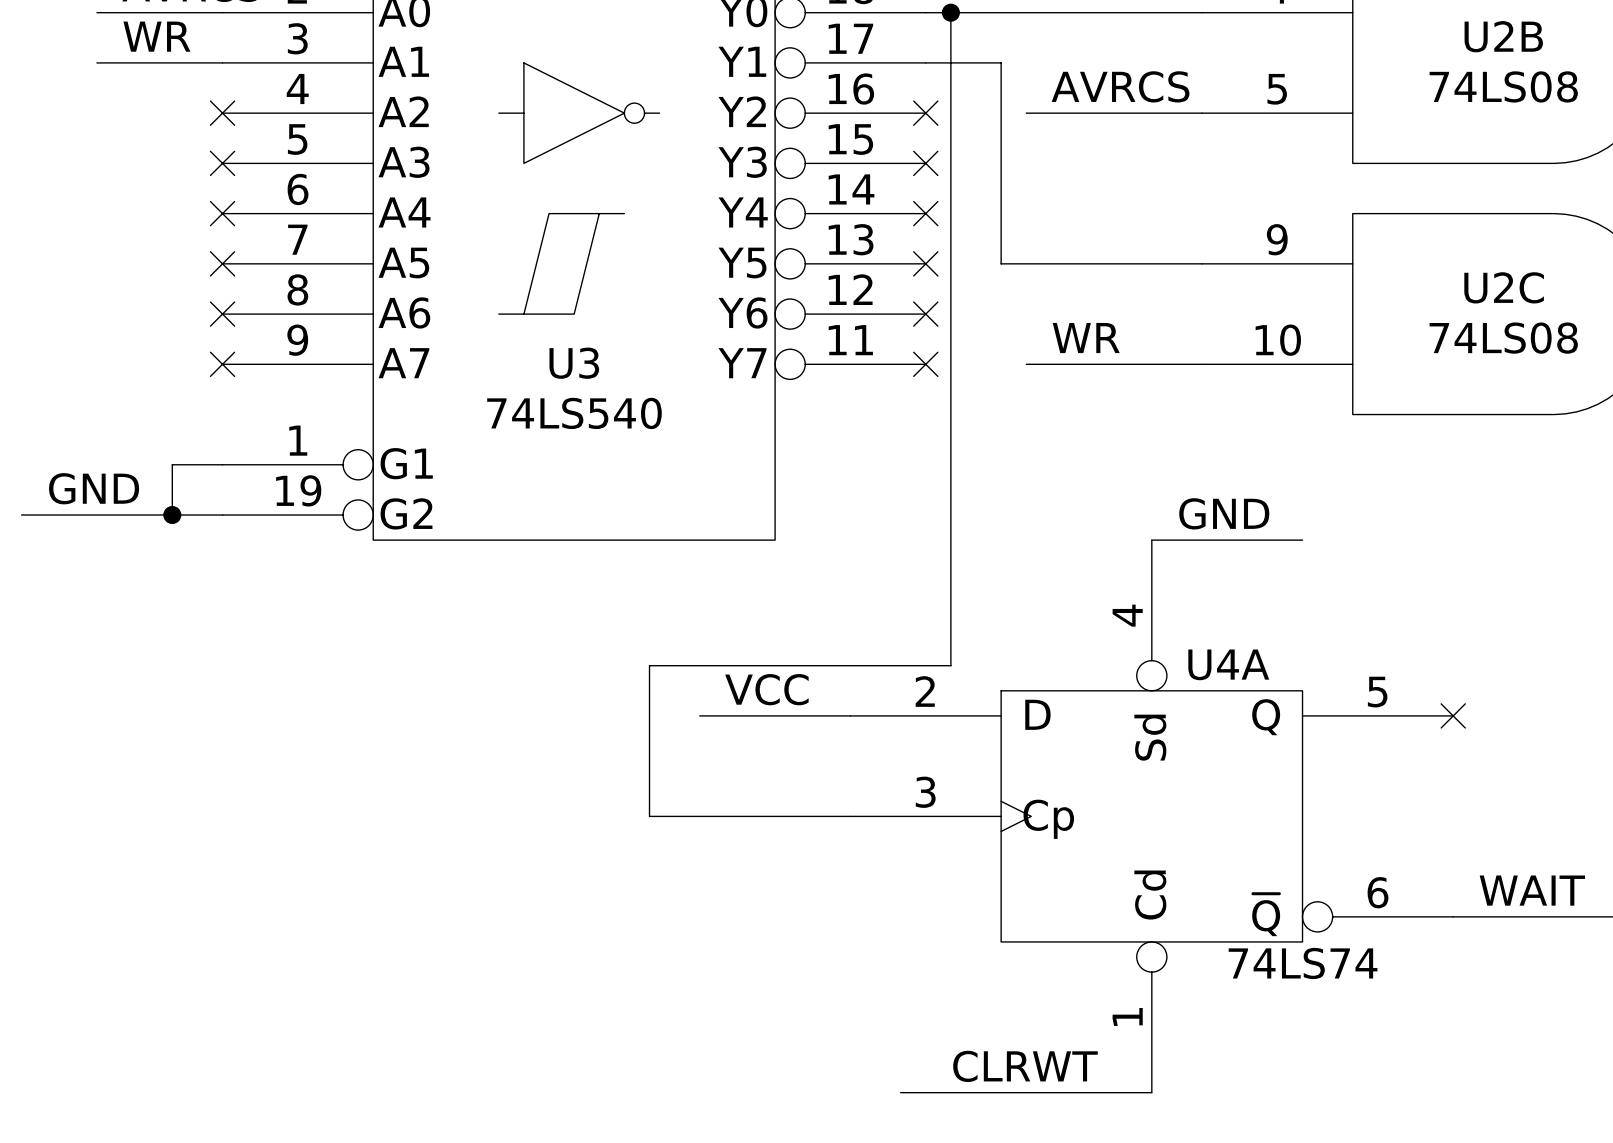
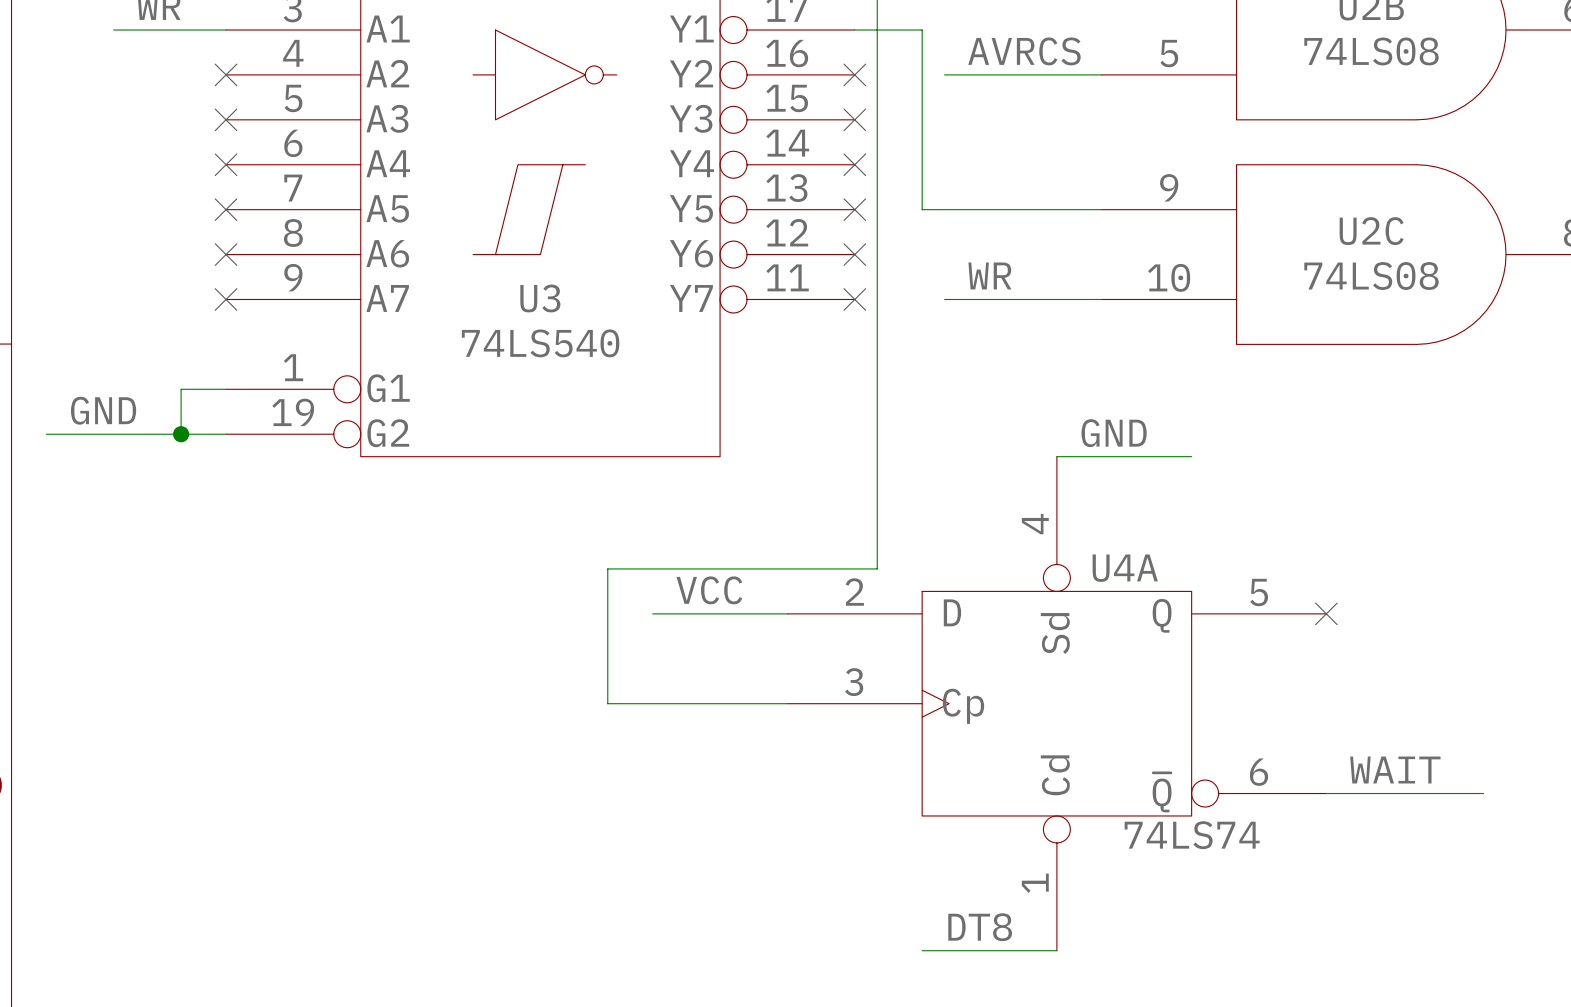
label: CLRWT (1025, 1066) -> none
label: none -> DT8 (980, 927)
wire: (900, 1092) (1001, 1092) -> none

